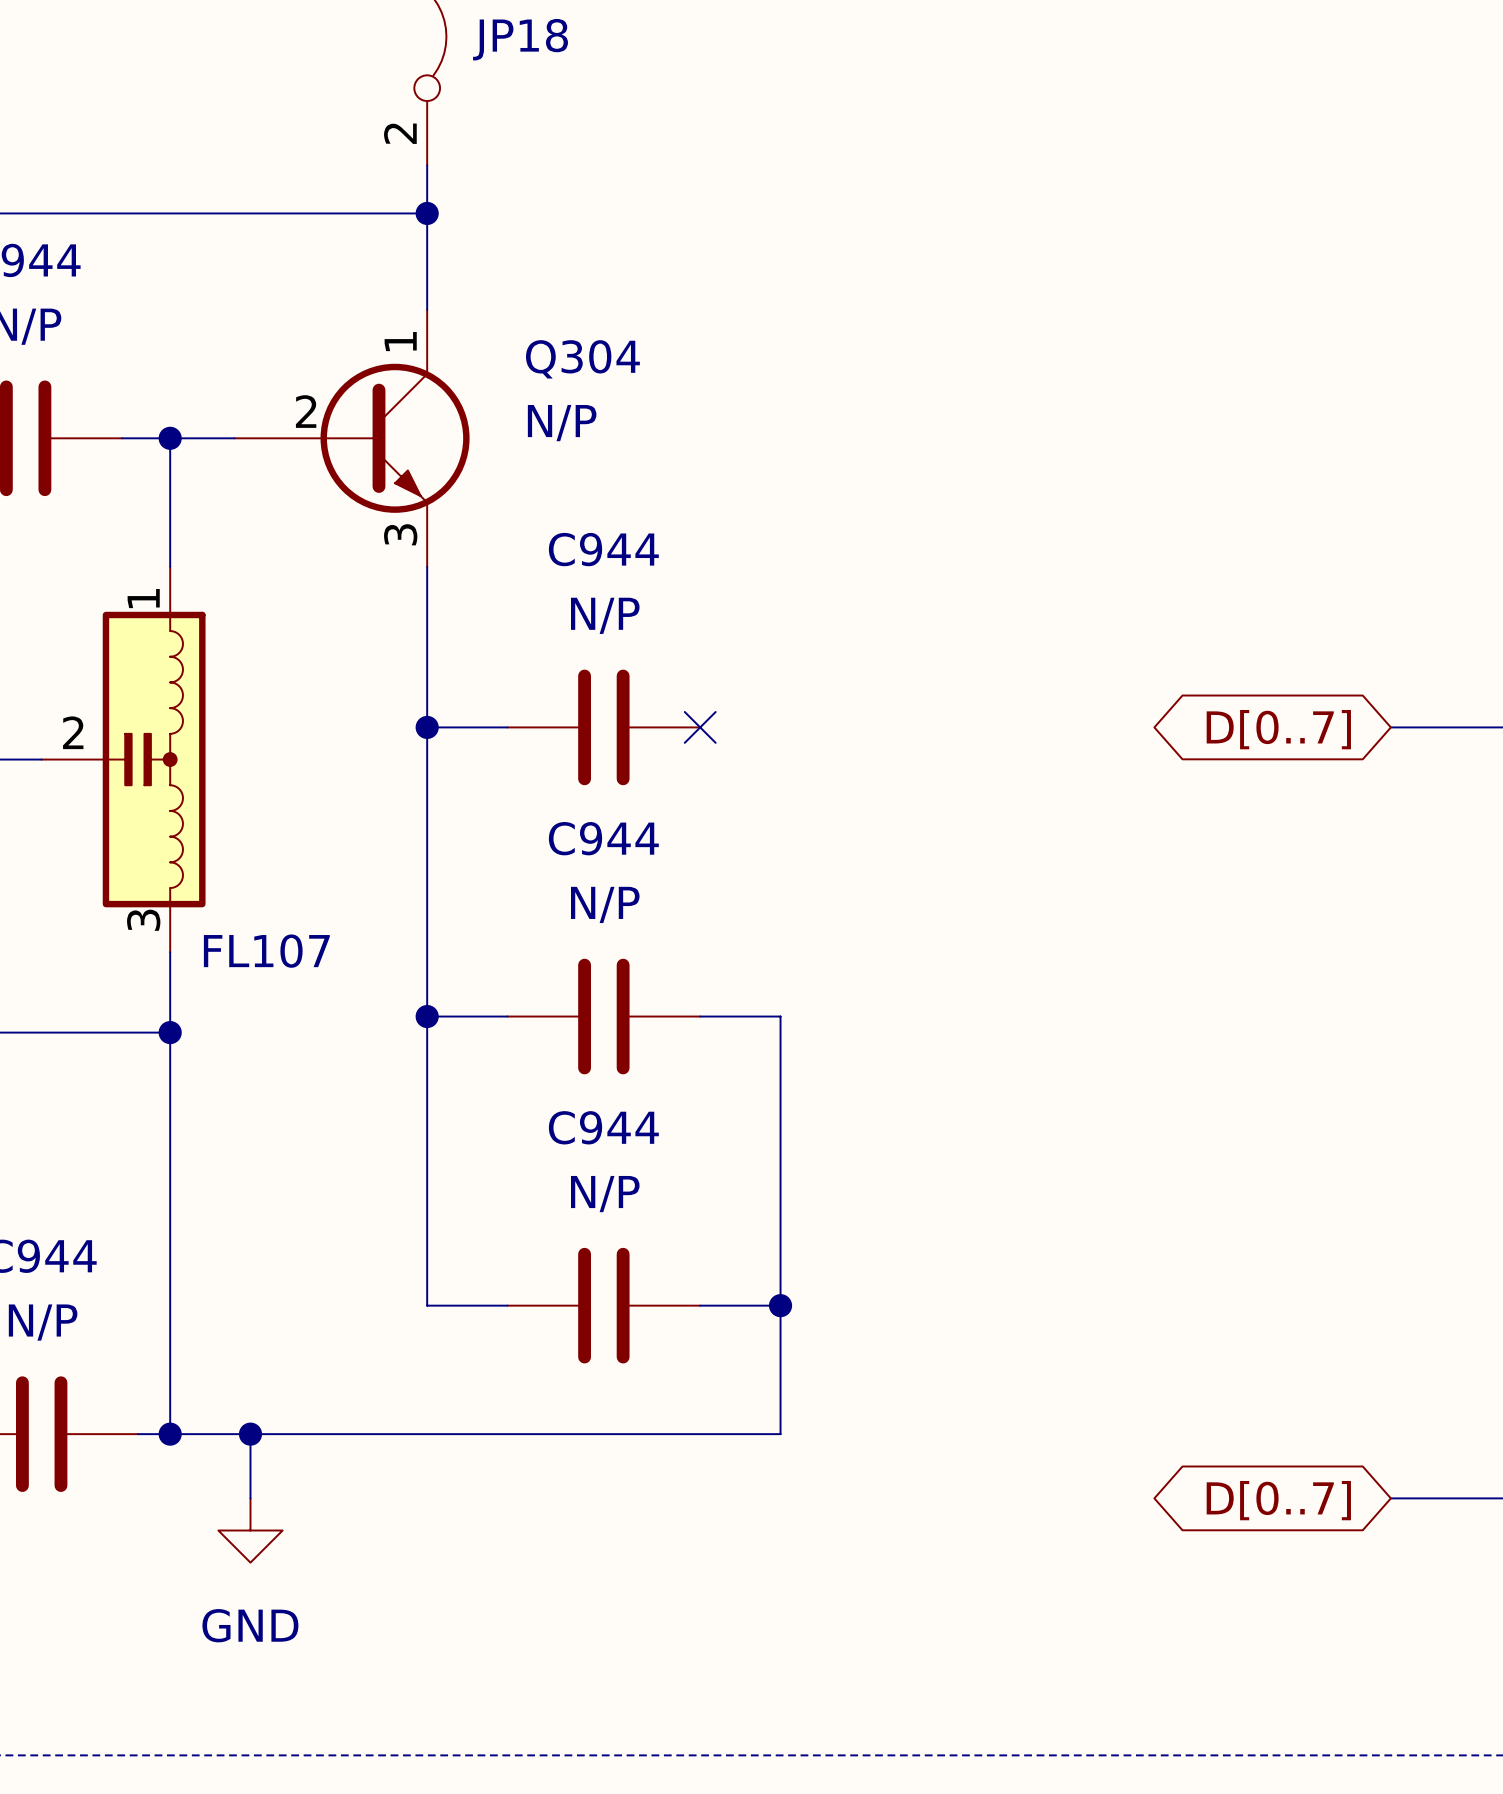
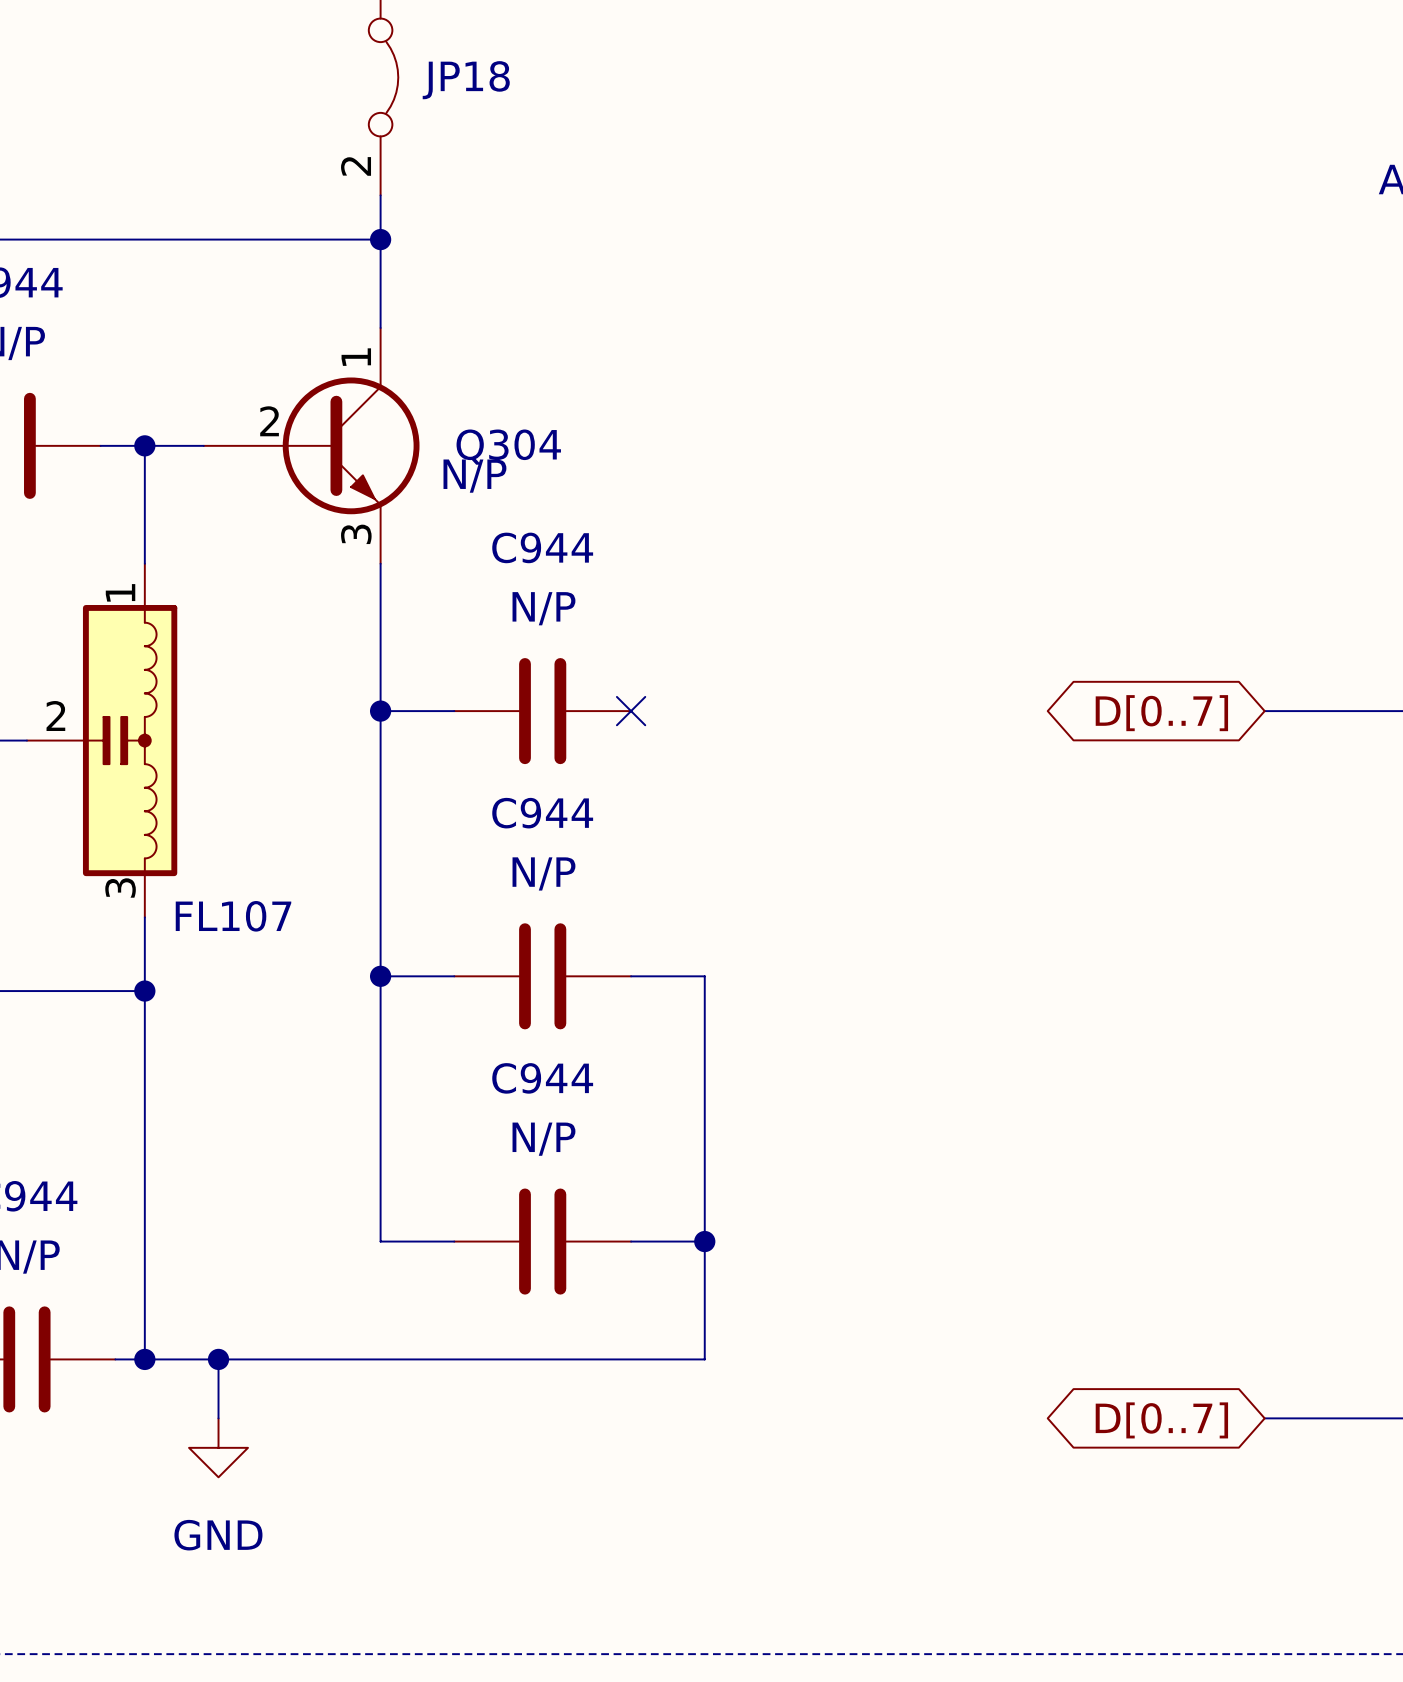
Q304 name position: Q304 (582, 359) -> Q304 (508, 447)
Q304 value position: N/P (562, 423) -> N/P (474, 476)

